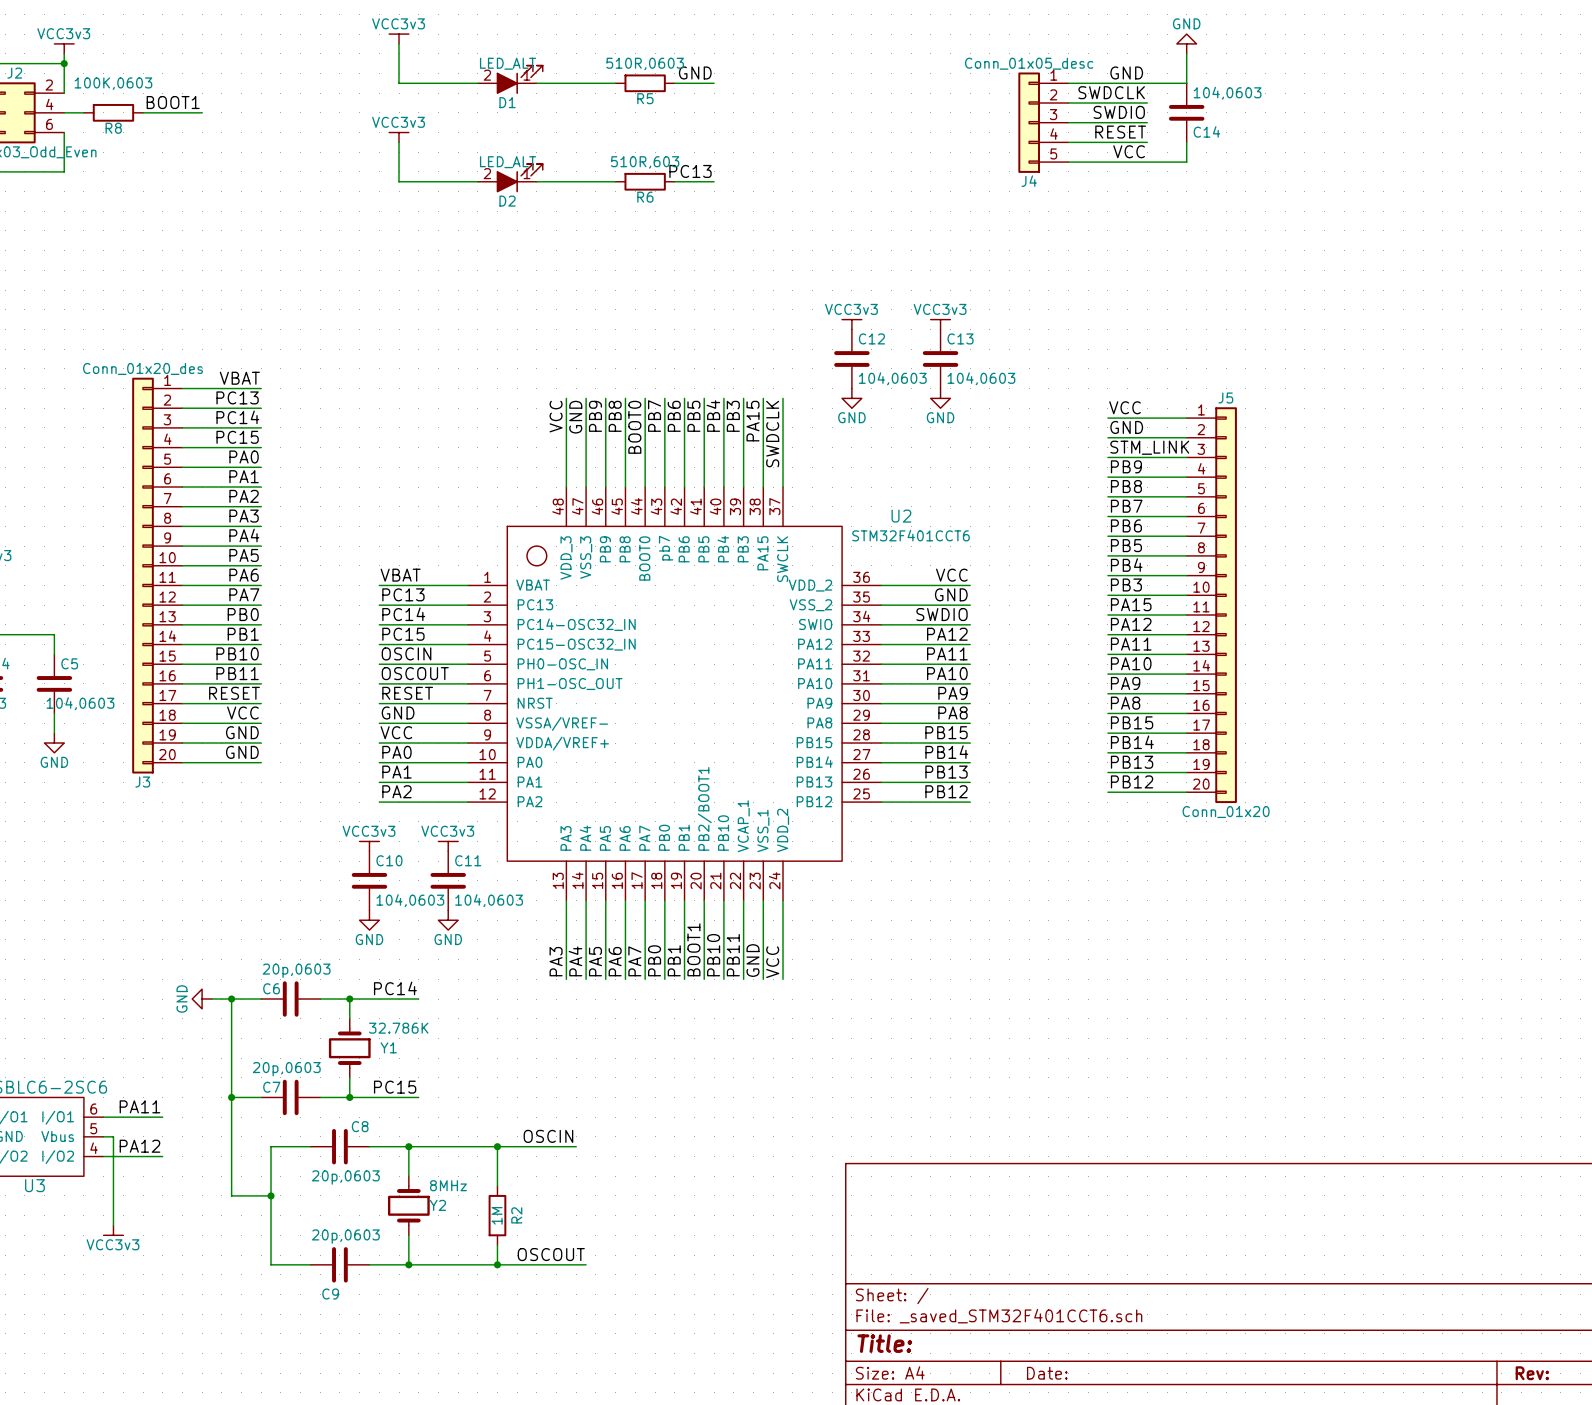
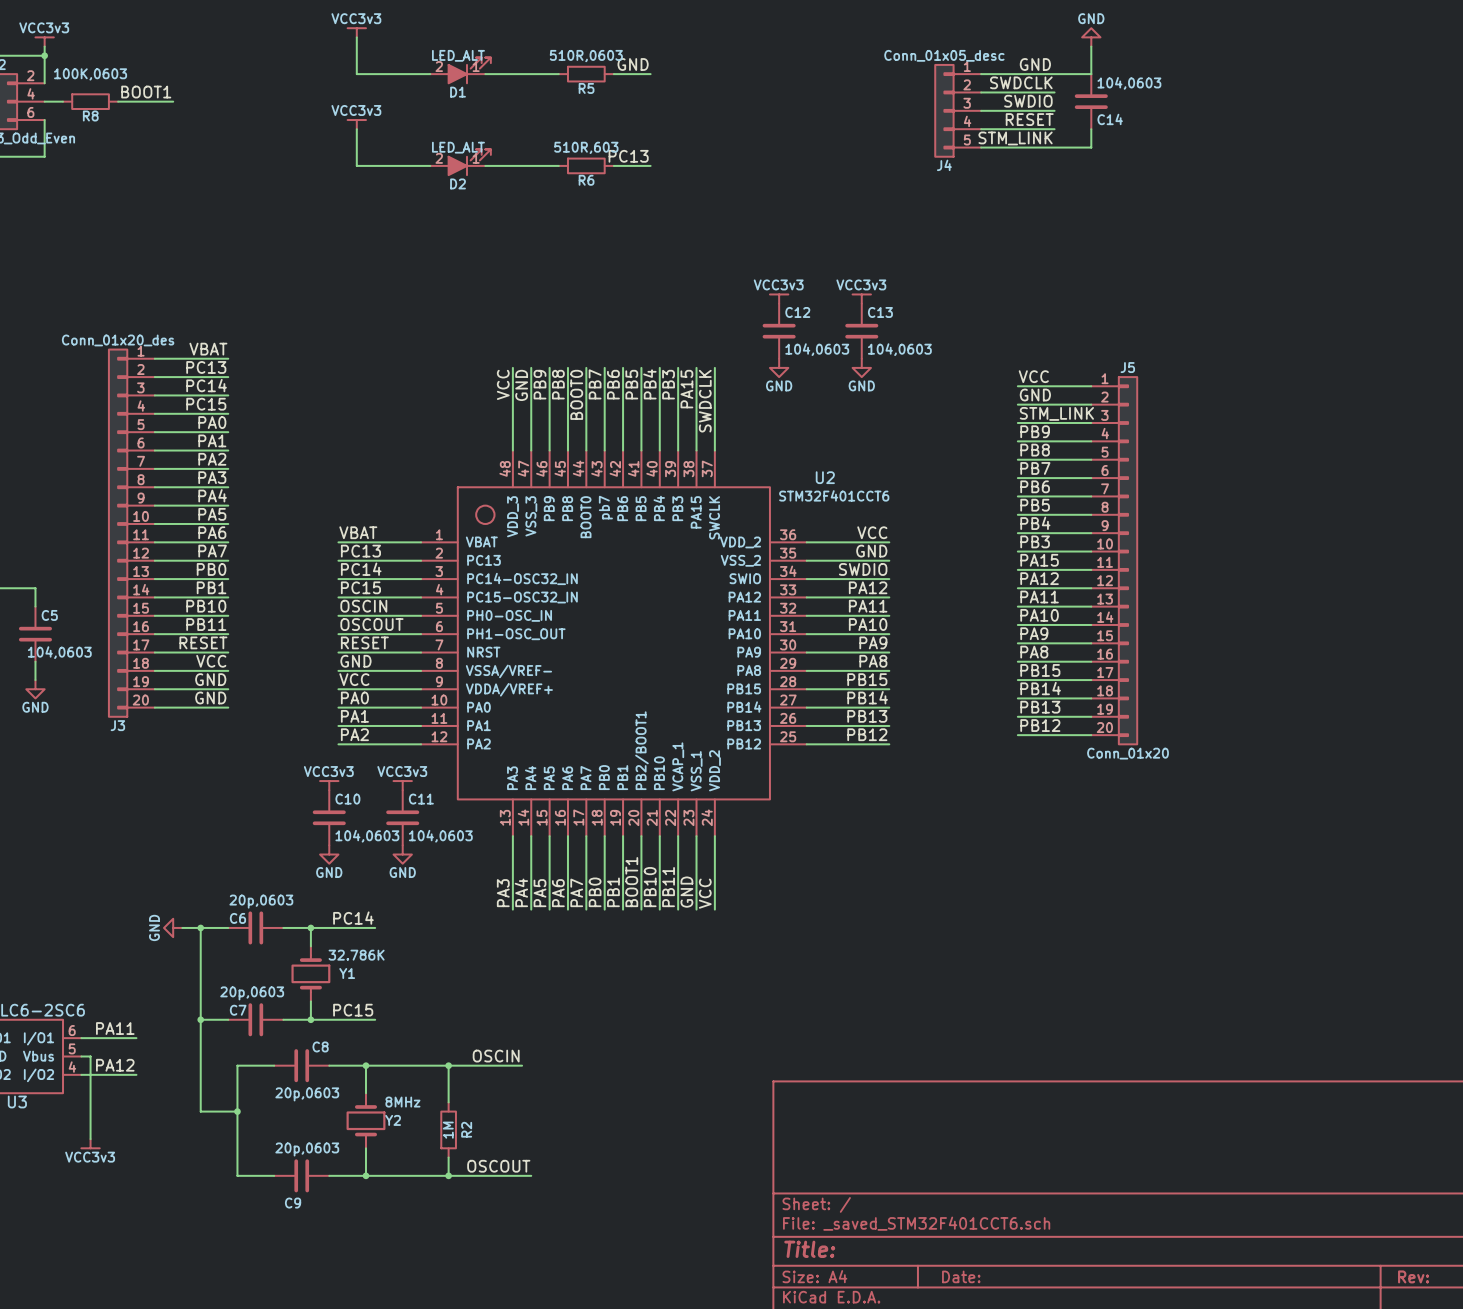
label: VCC (1129, 151) -> STM_LINK (1015, 138)

